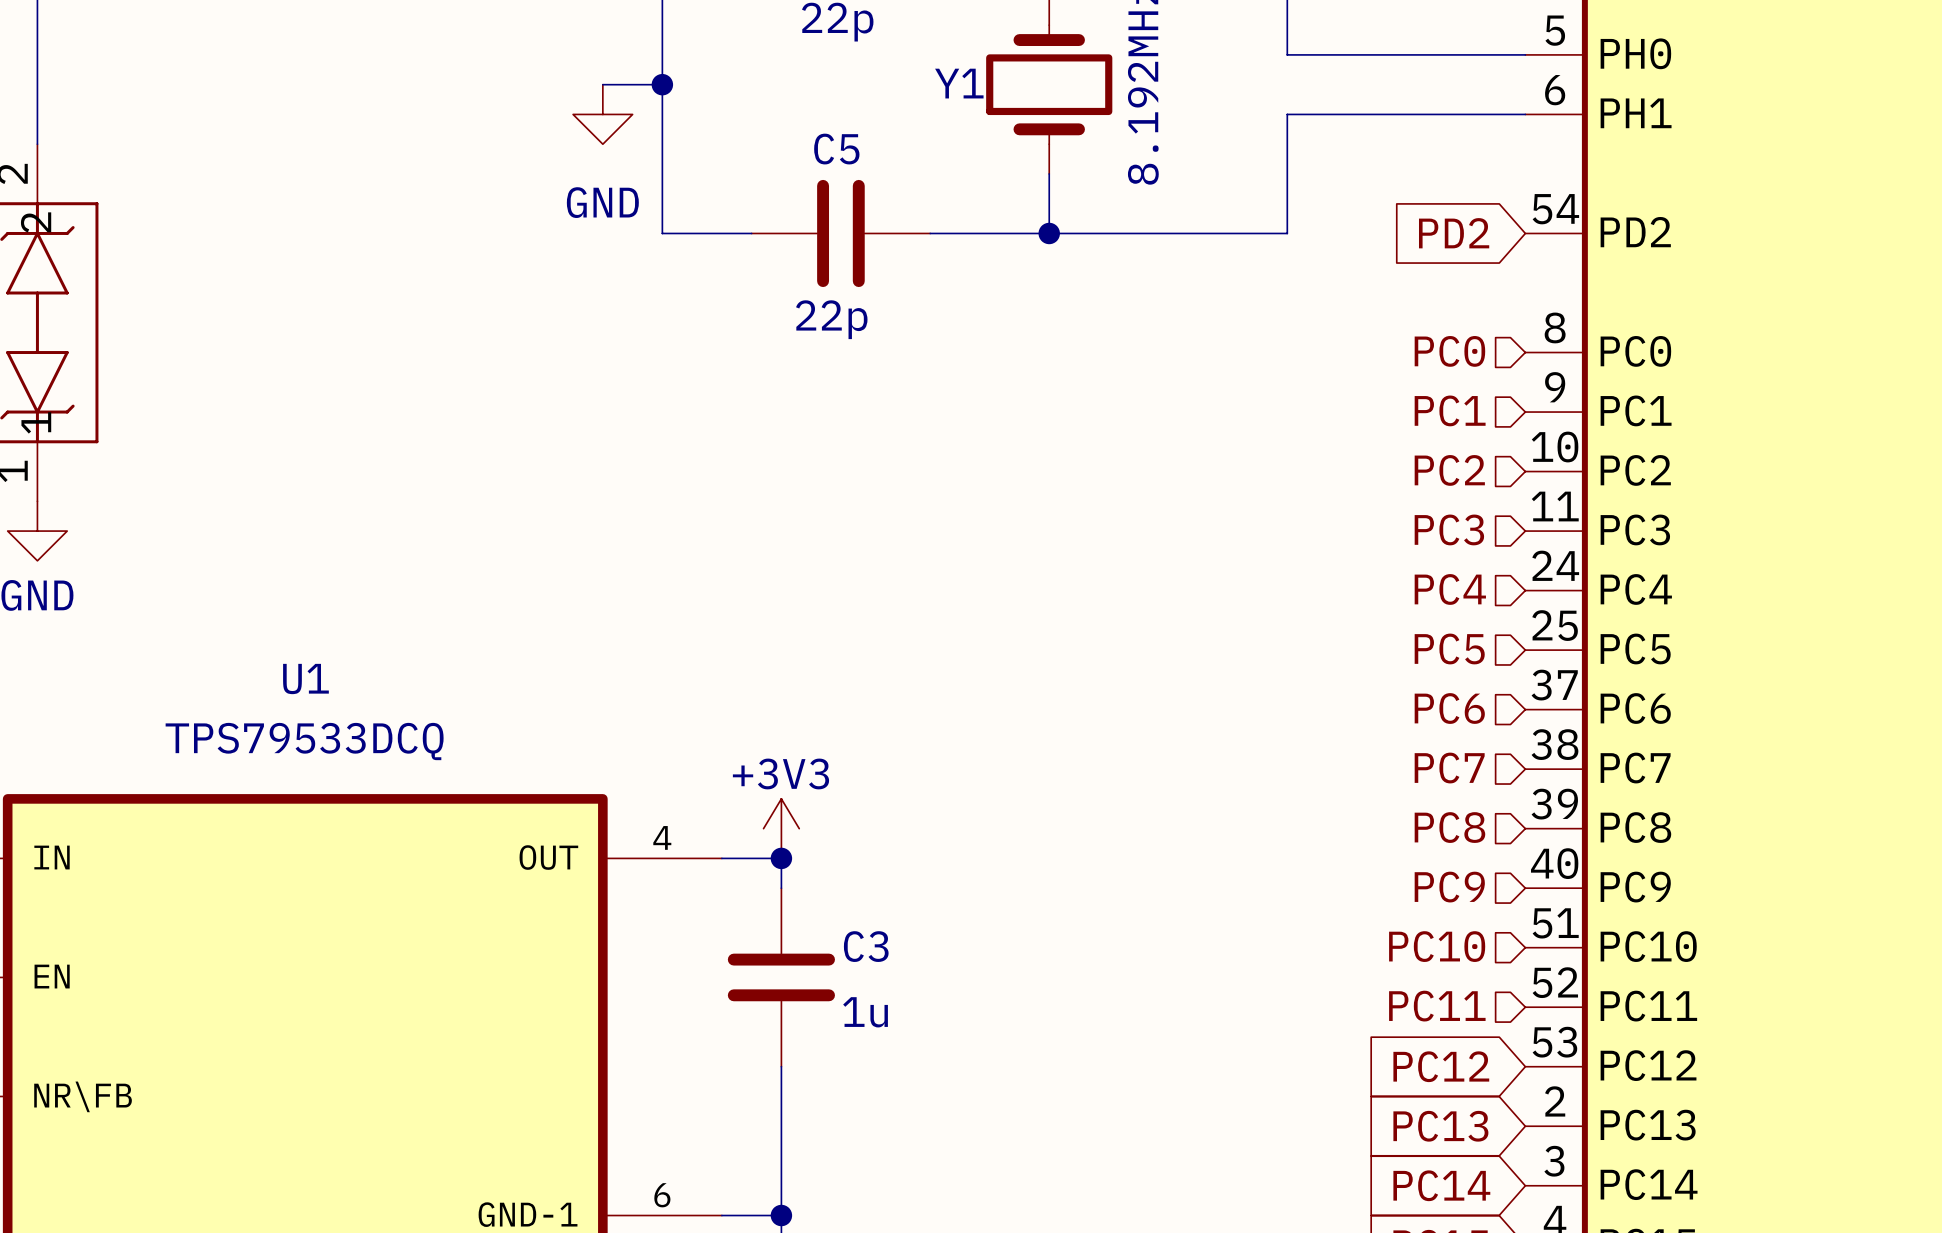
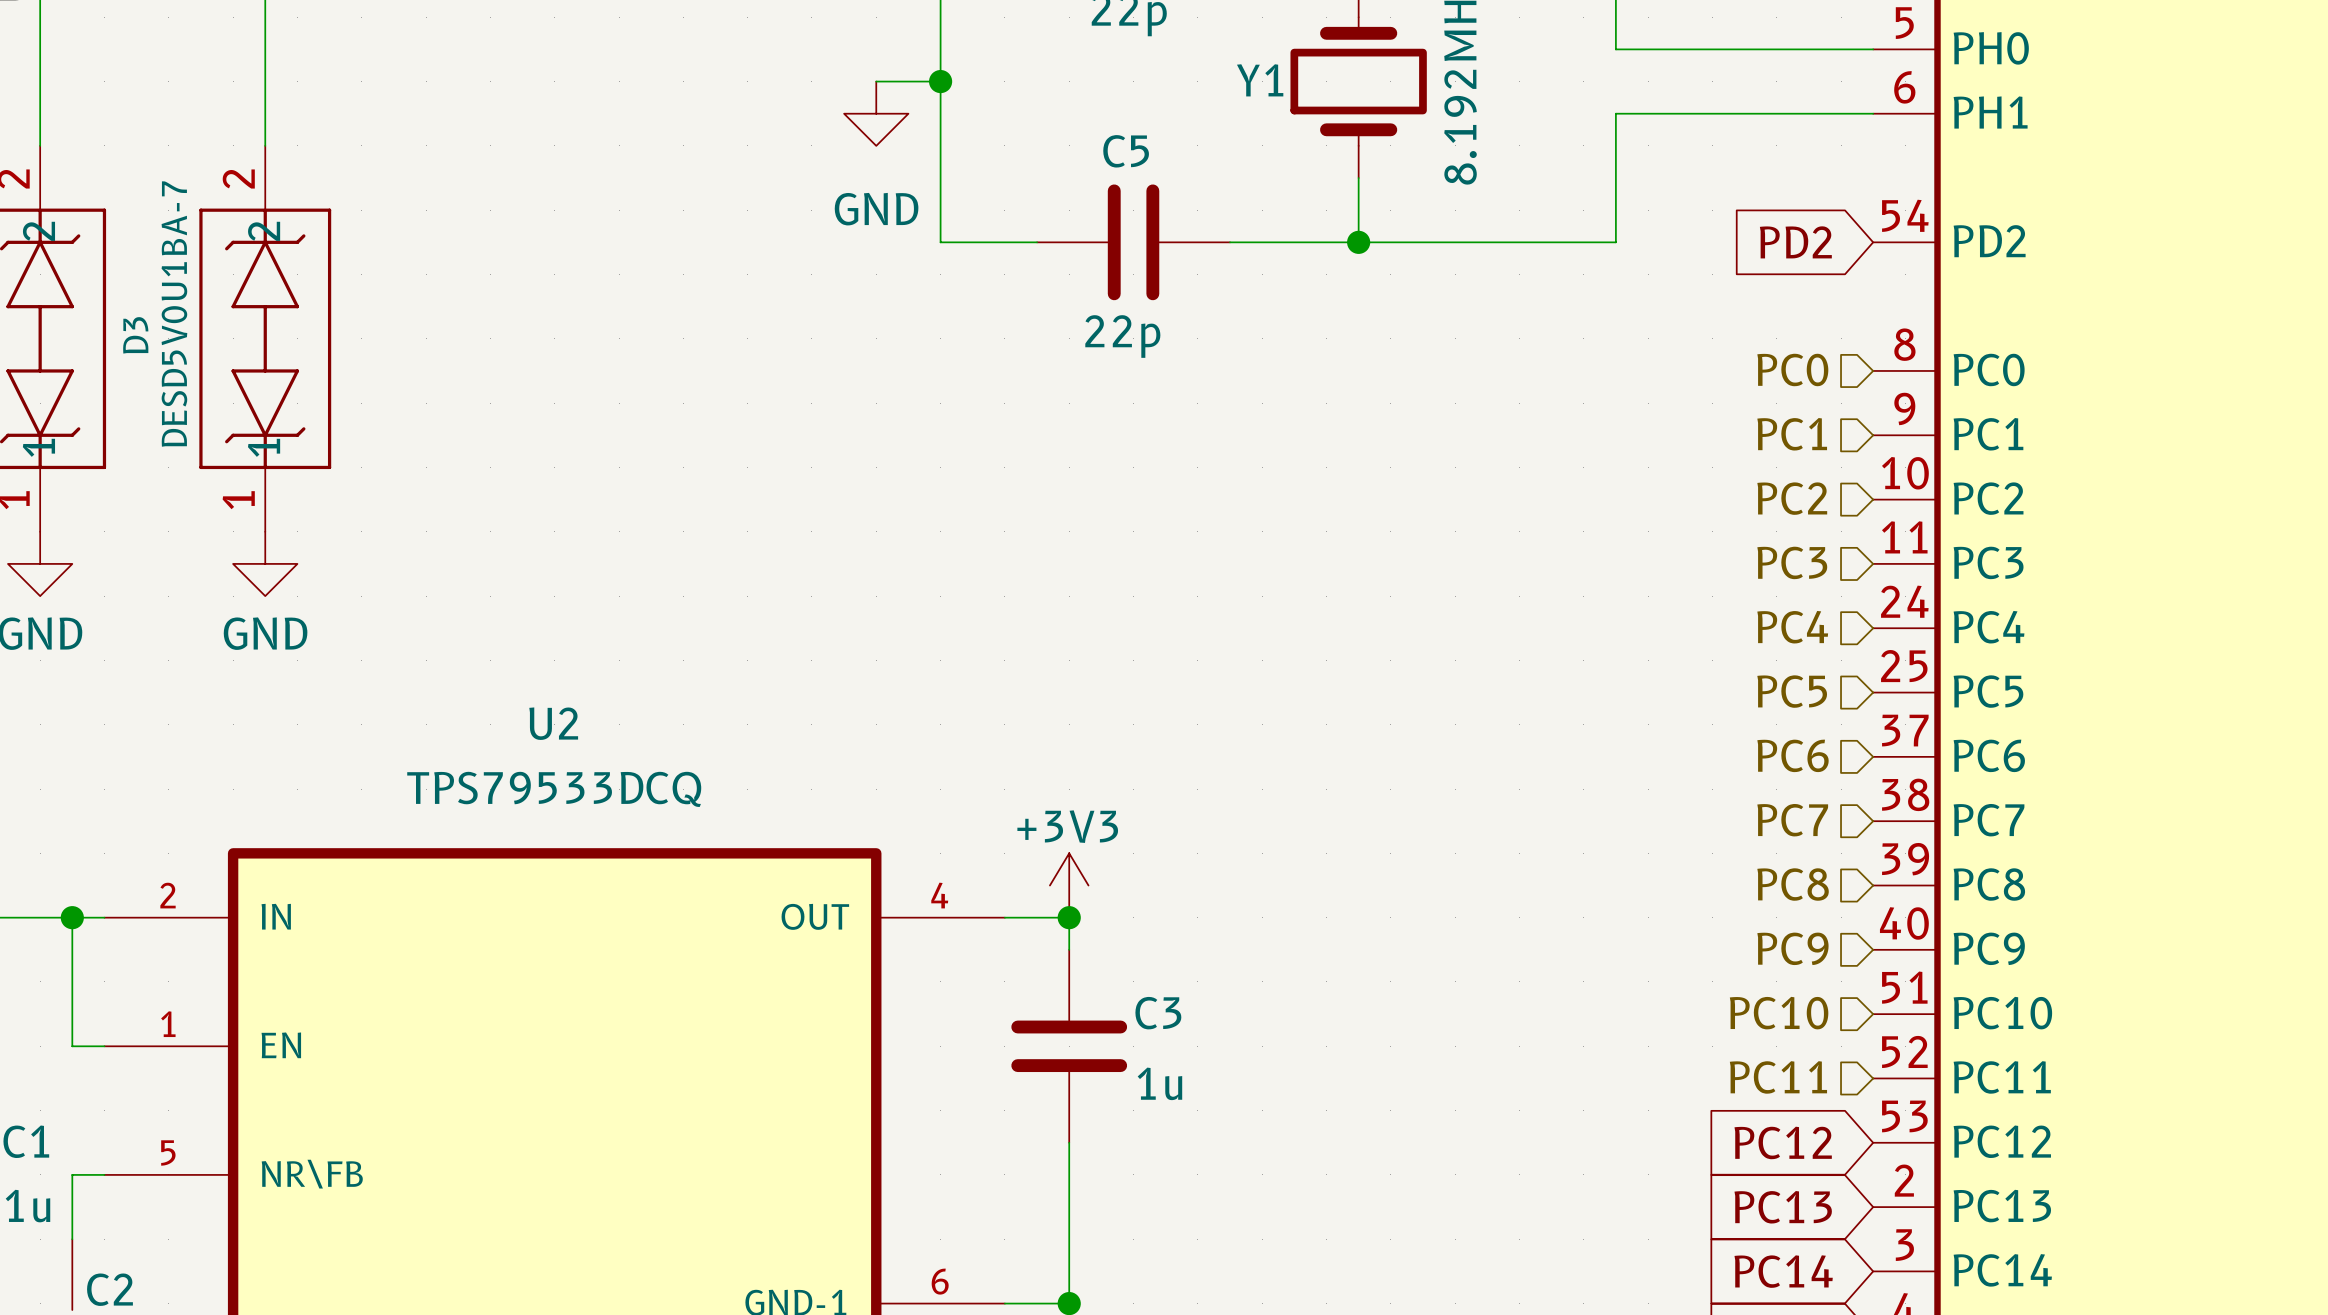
U1 name: U1 (305, 679) -> U2 (553, 723)

